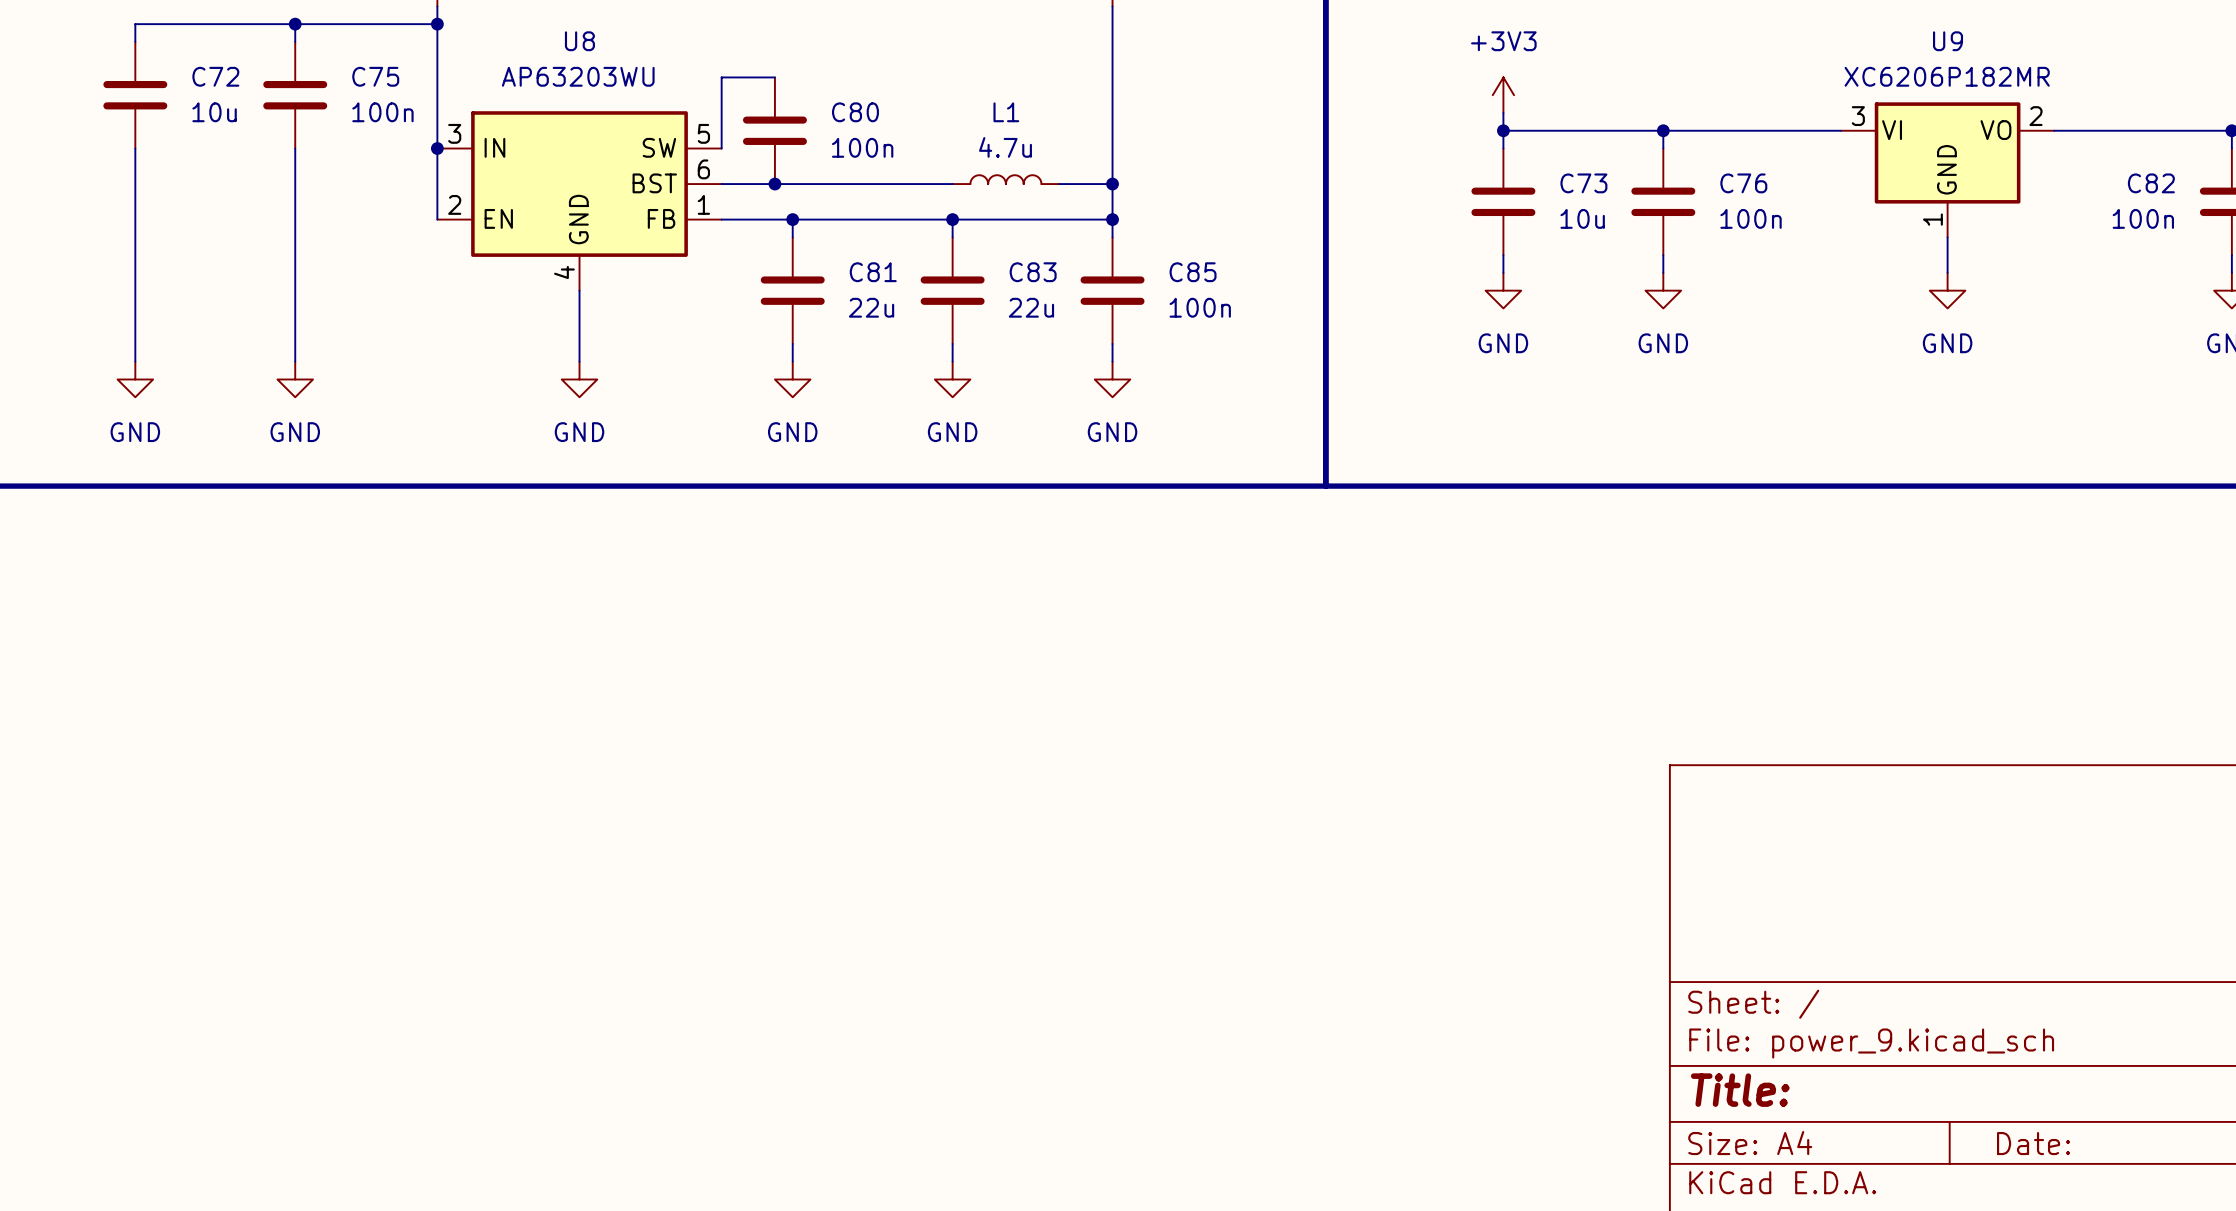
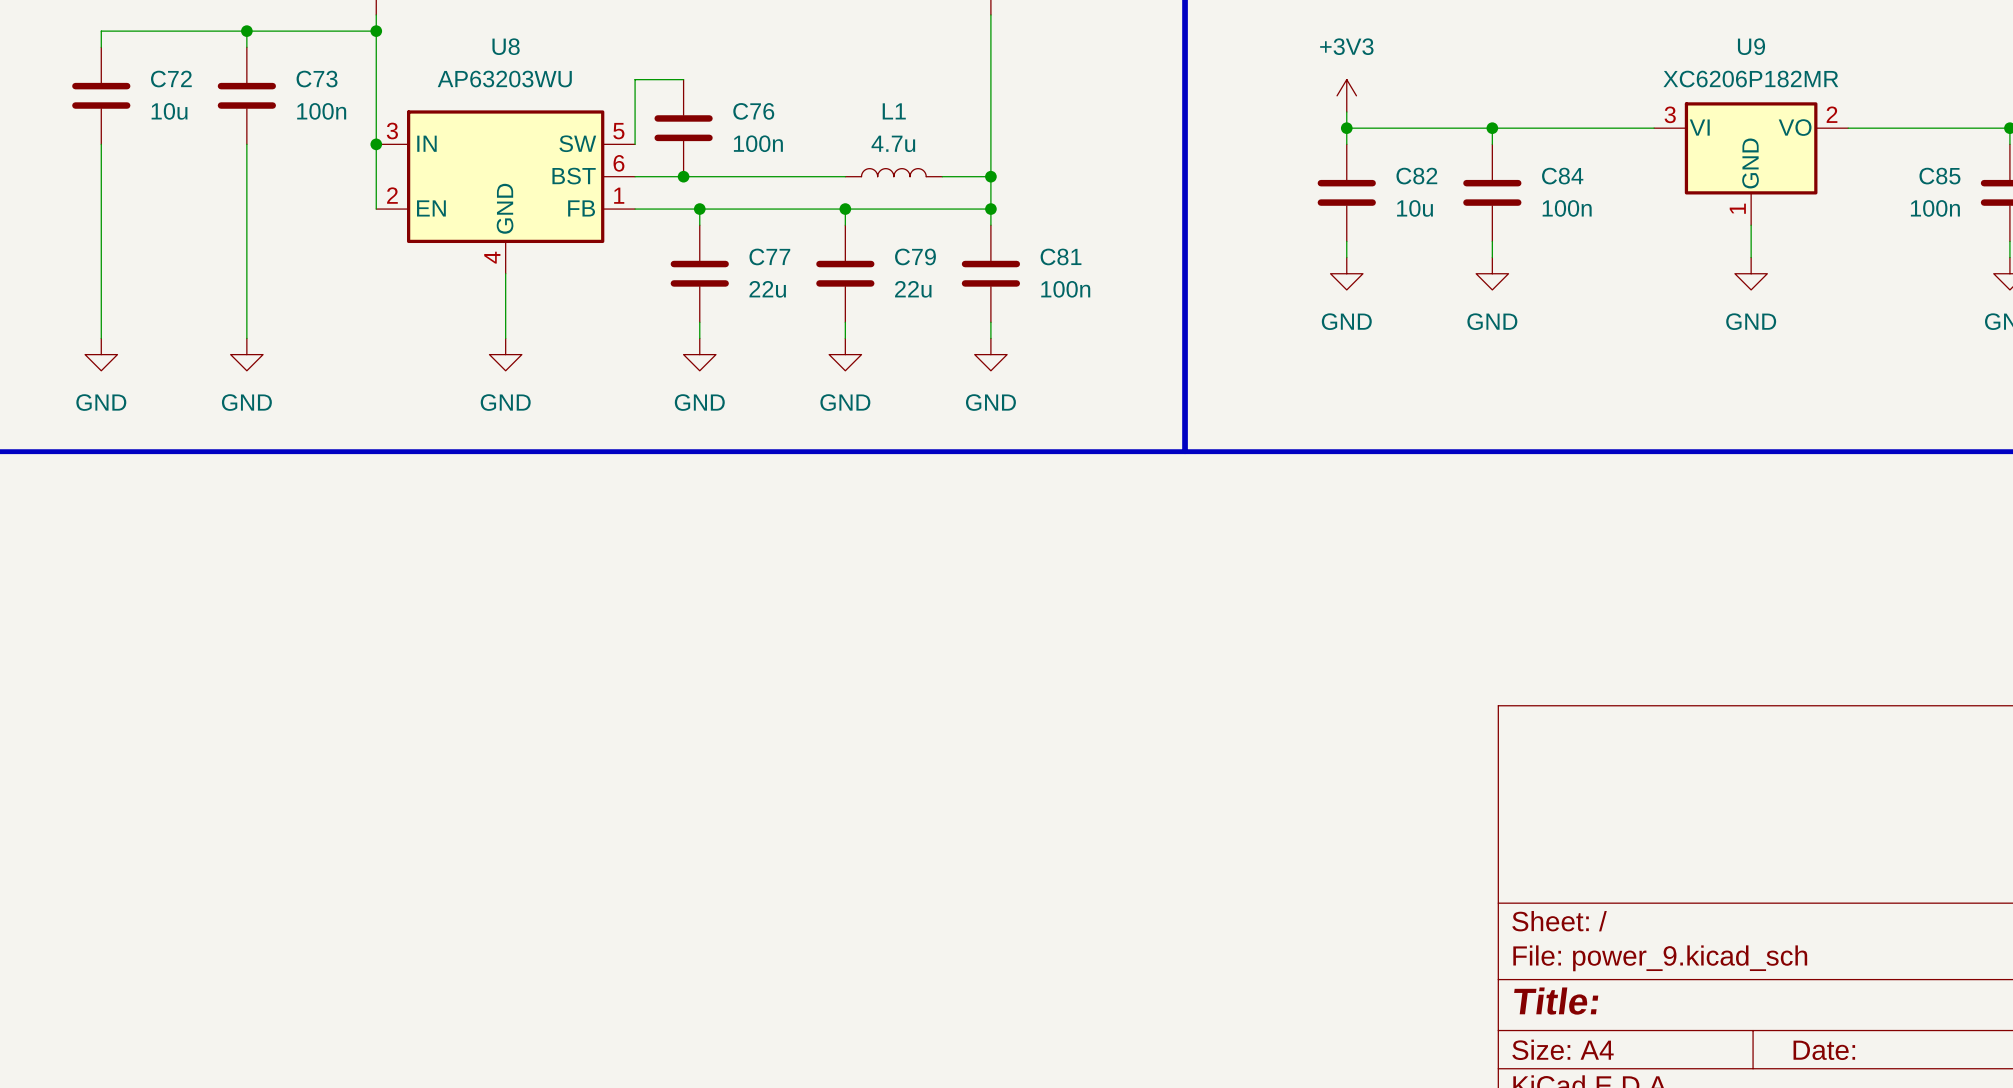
C75 name: C75 (375, 76) -> C73 (317, 79)
C80 name: C80 (855, 112) -> C76 (753, 111)
C73 name: C73 (1583, 183) -> C82 (1416, 176)
C76 name: C76 (1743, 183) -> C84 (1562, 176)
C82 name: C82 (2151, 183) -> C85 (1939, 176)
C81 name: C81 (873, 272) -> C77 (769, 256)
C83 name: C83 (1033, 272) -> C79 (915, 256)
C85 name: C85 (1193, 272) -> C81 (1061, 256)

